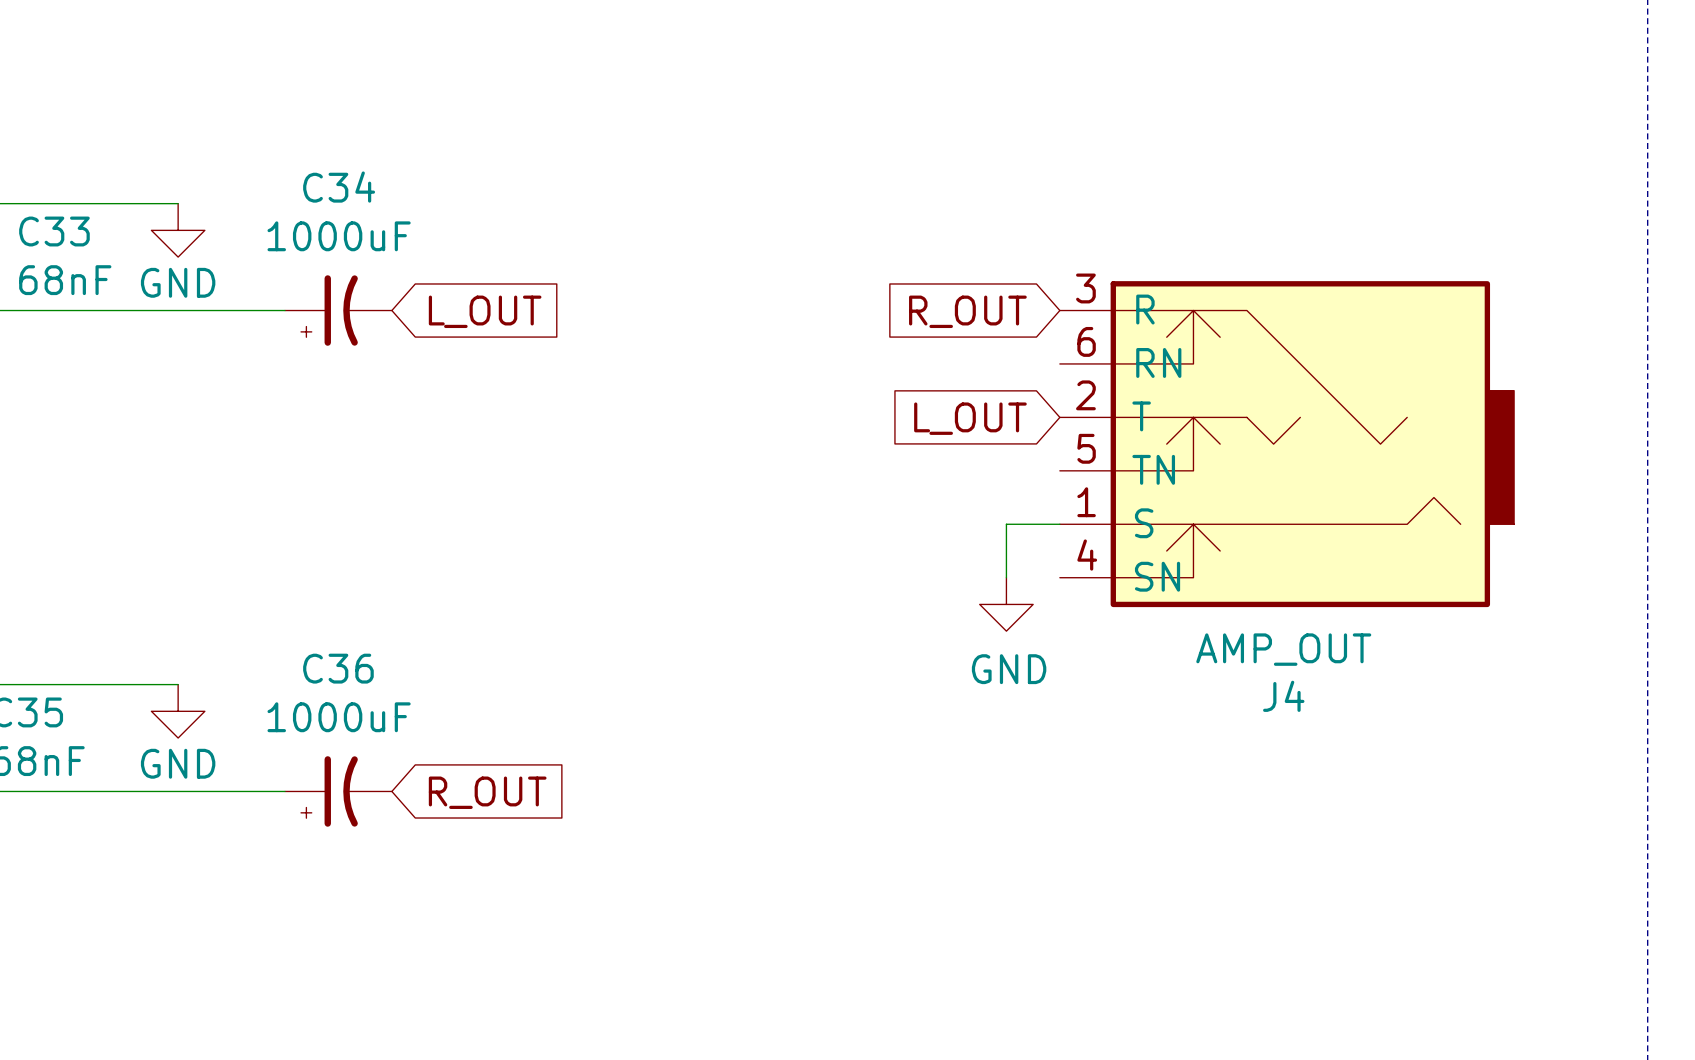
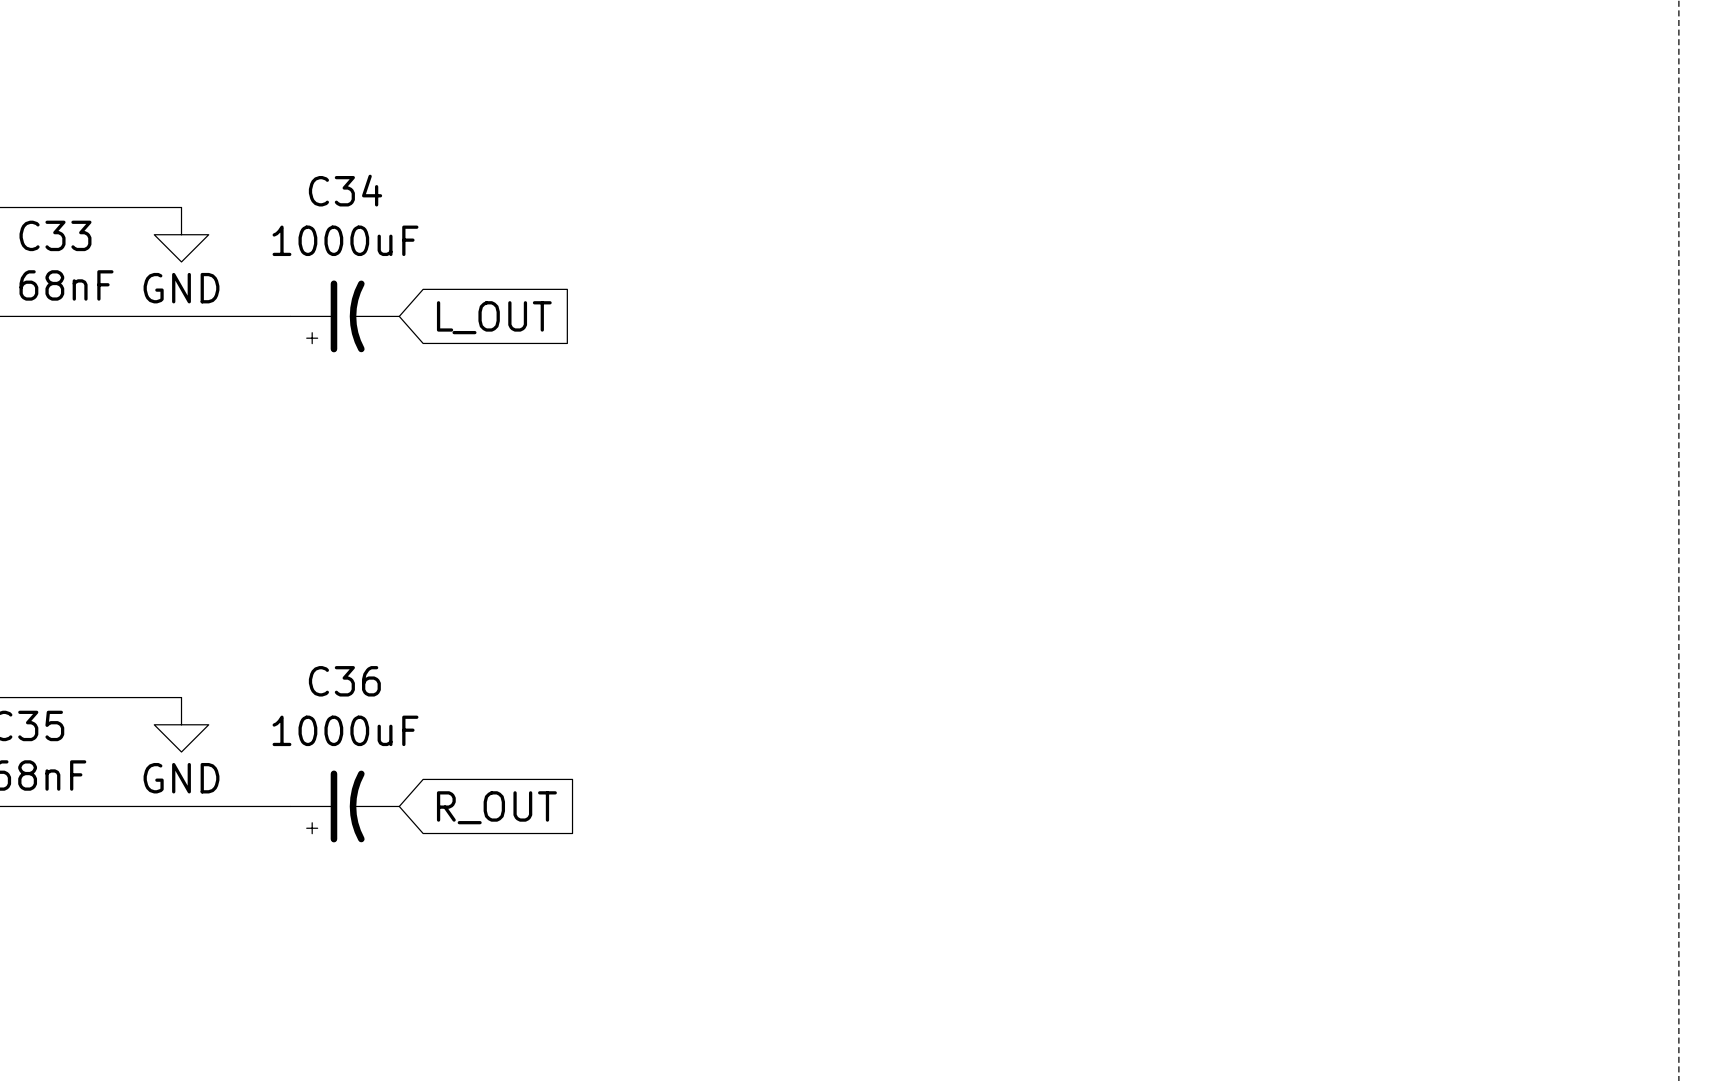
global label: R_OUT (967, 311) -> none
global label: L_OUT (970, 418) -> none
J4: AMP_OUT (1286, 444) -> none
wire: (1059, 524) (1006, 524) (1006, 577) -> none
power symbol: GND (1006, 604) -> none

